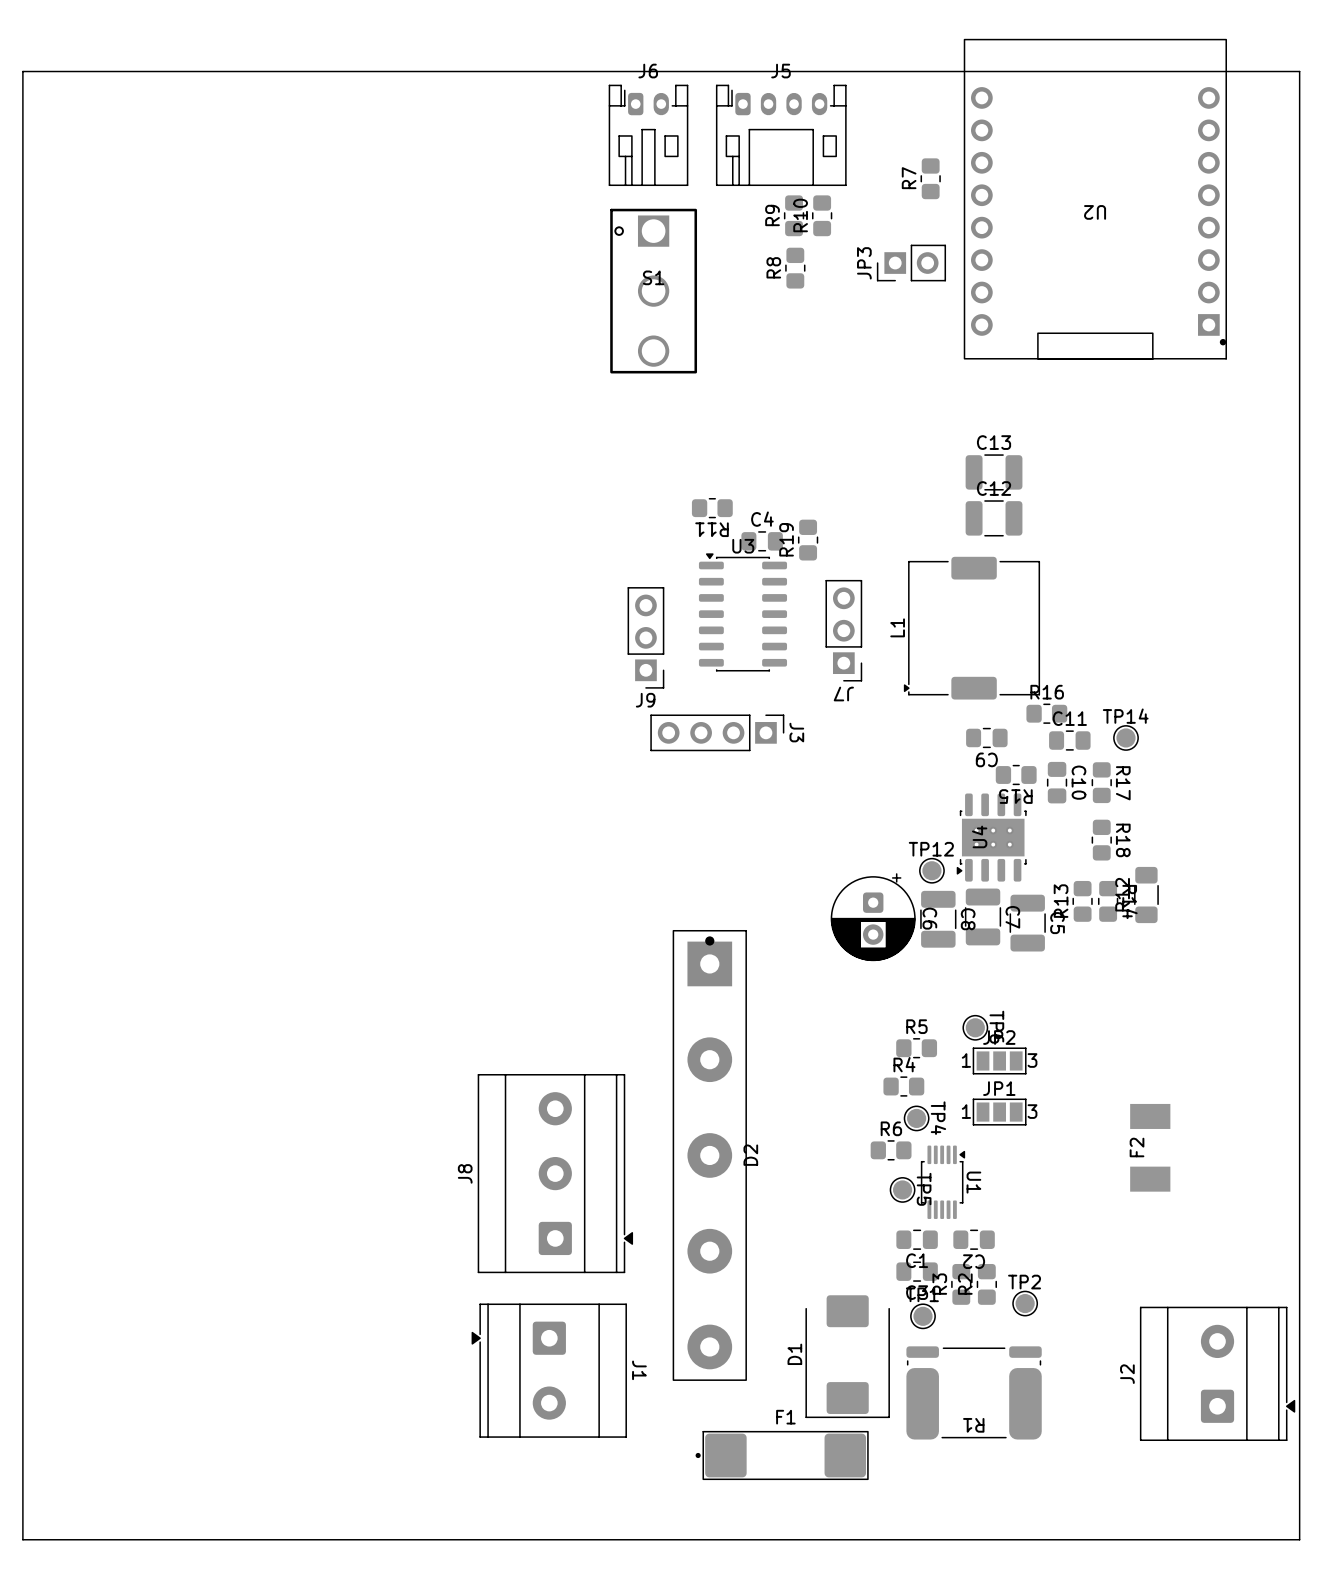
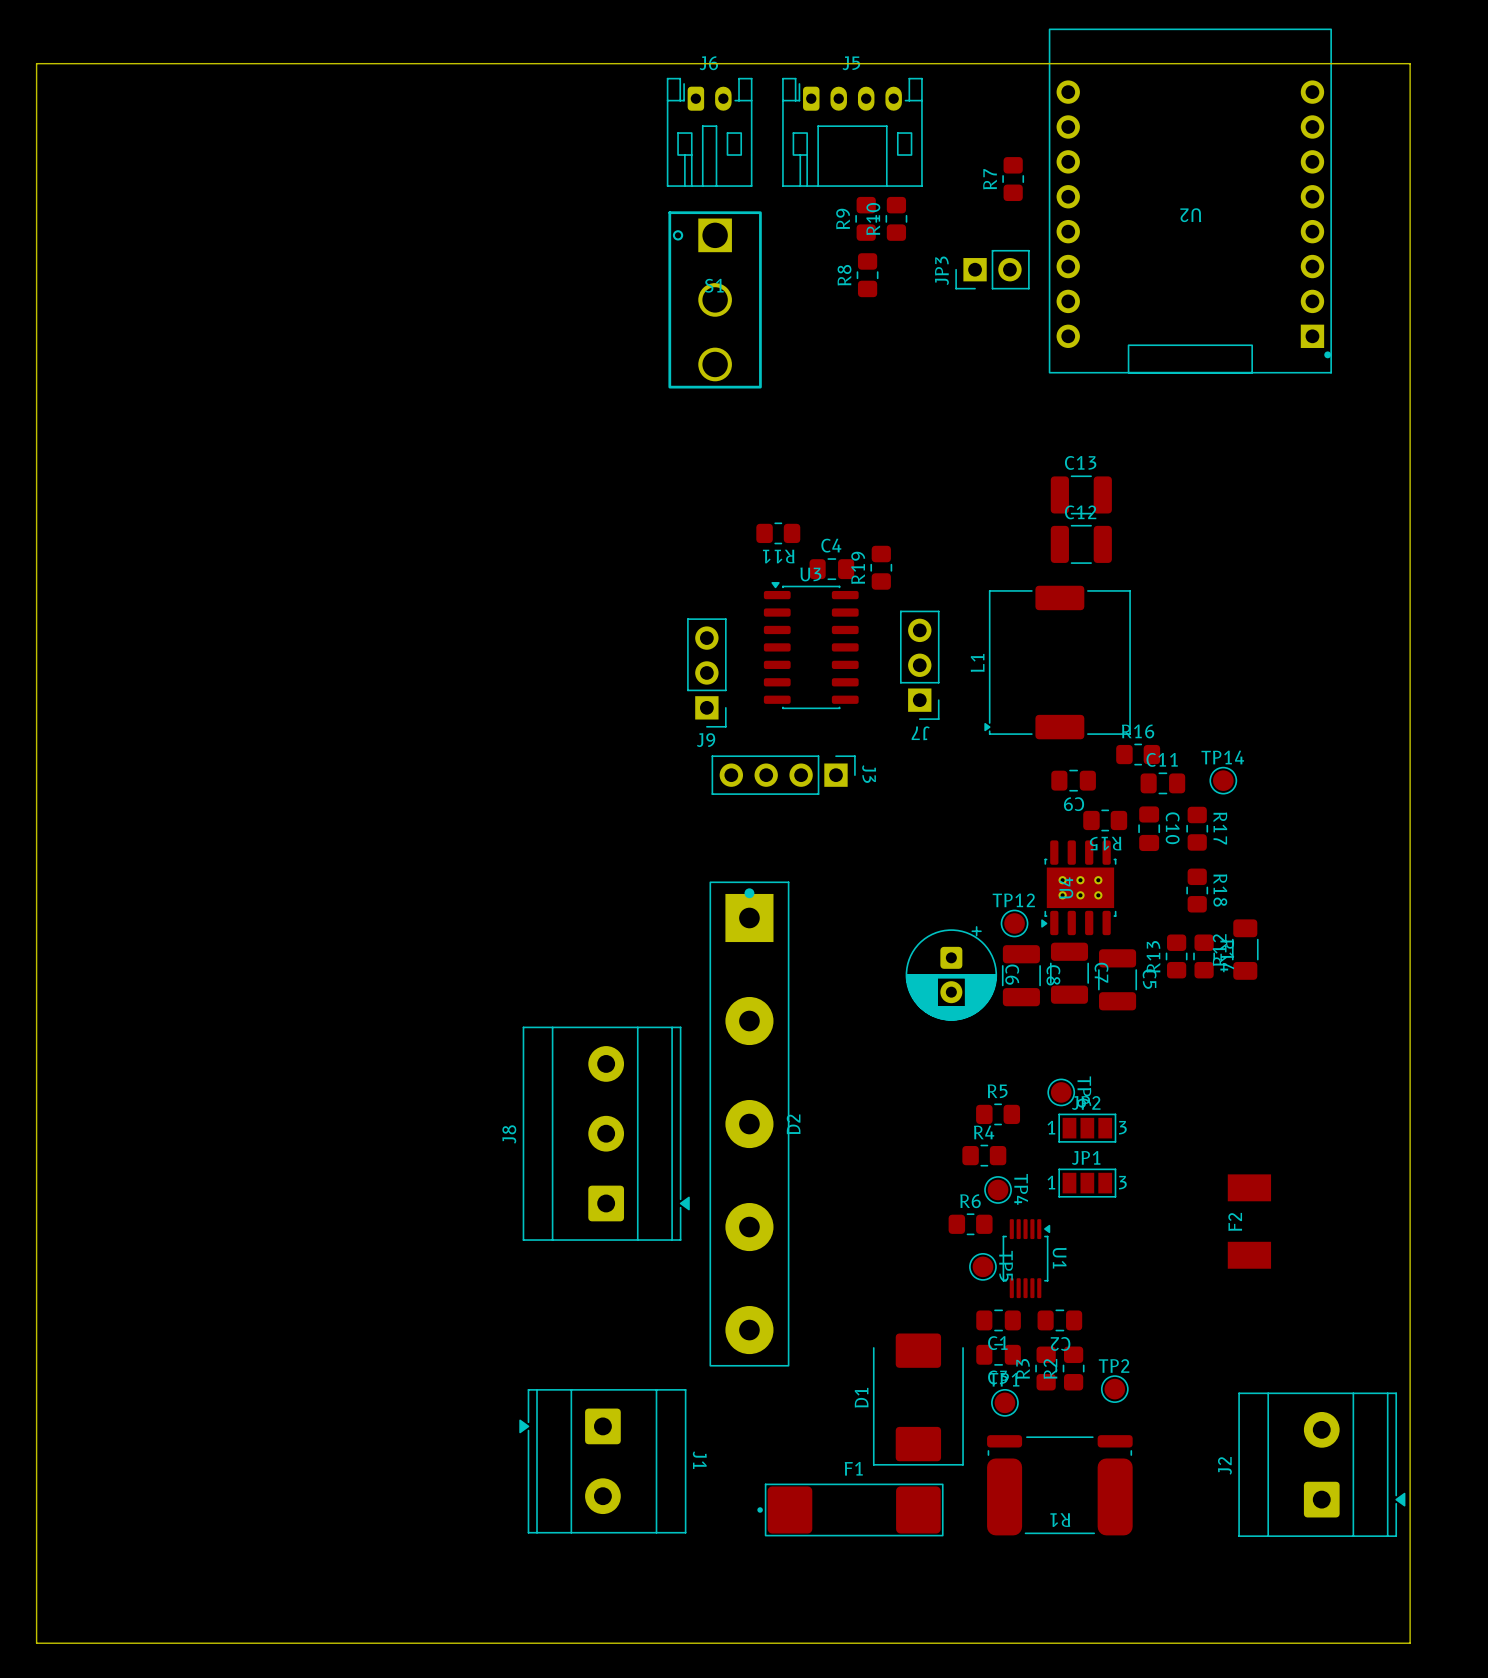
D2 position: (709, 1155) -> (749, 1124)
J8 position: (555, 1173) -> (606, 1133)
D1 position: (847, 1356) -> (918, 1399)
F1 position: (782, 1455) -> (850, 1509)

